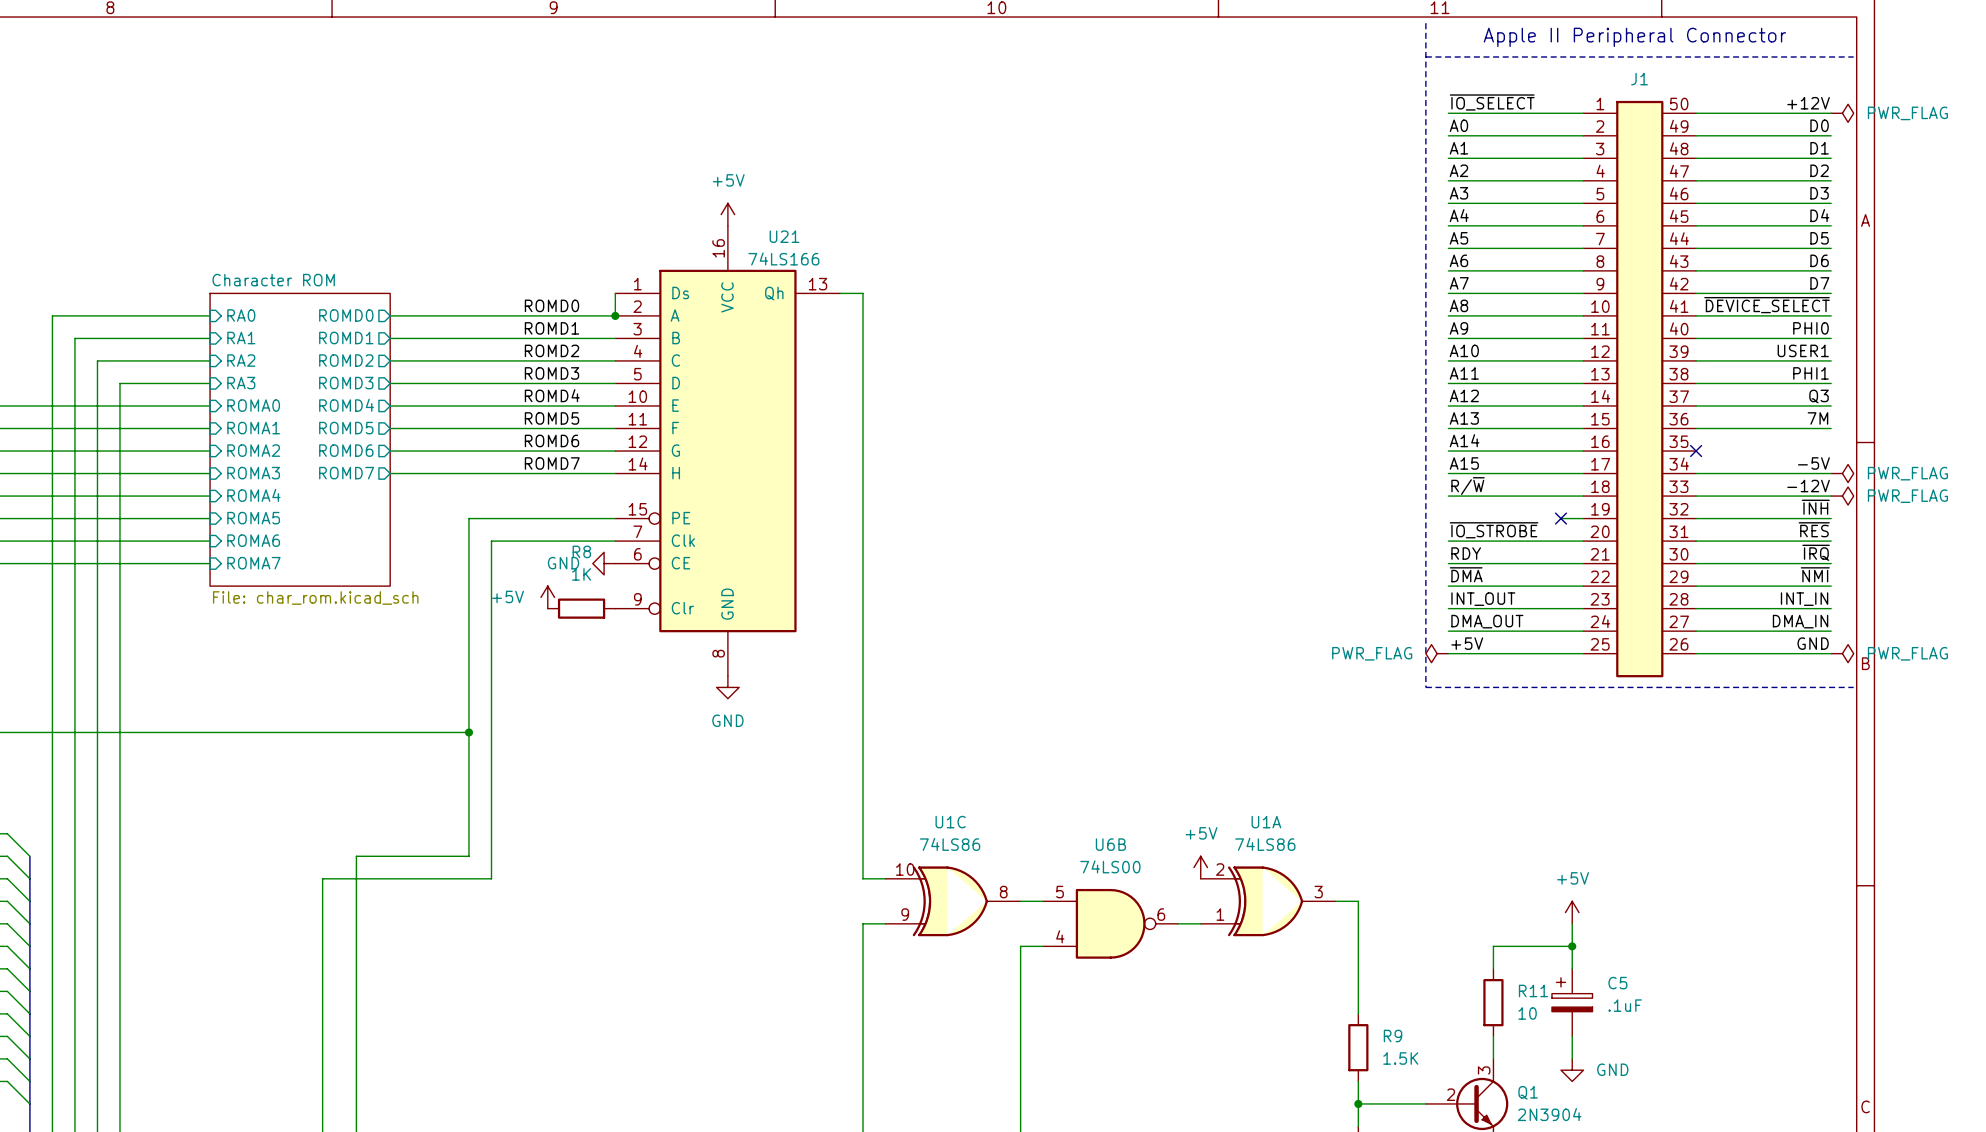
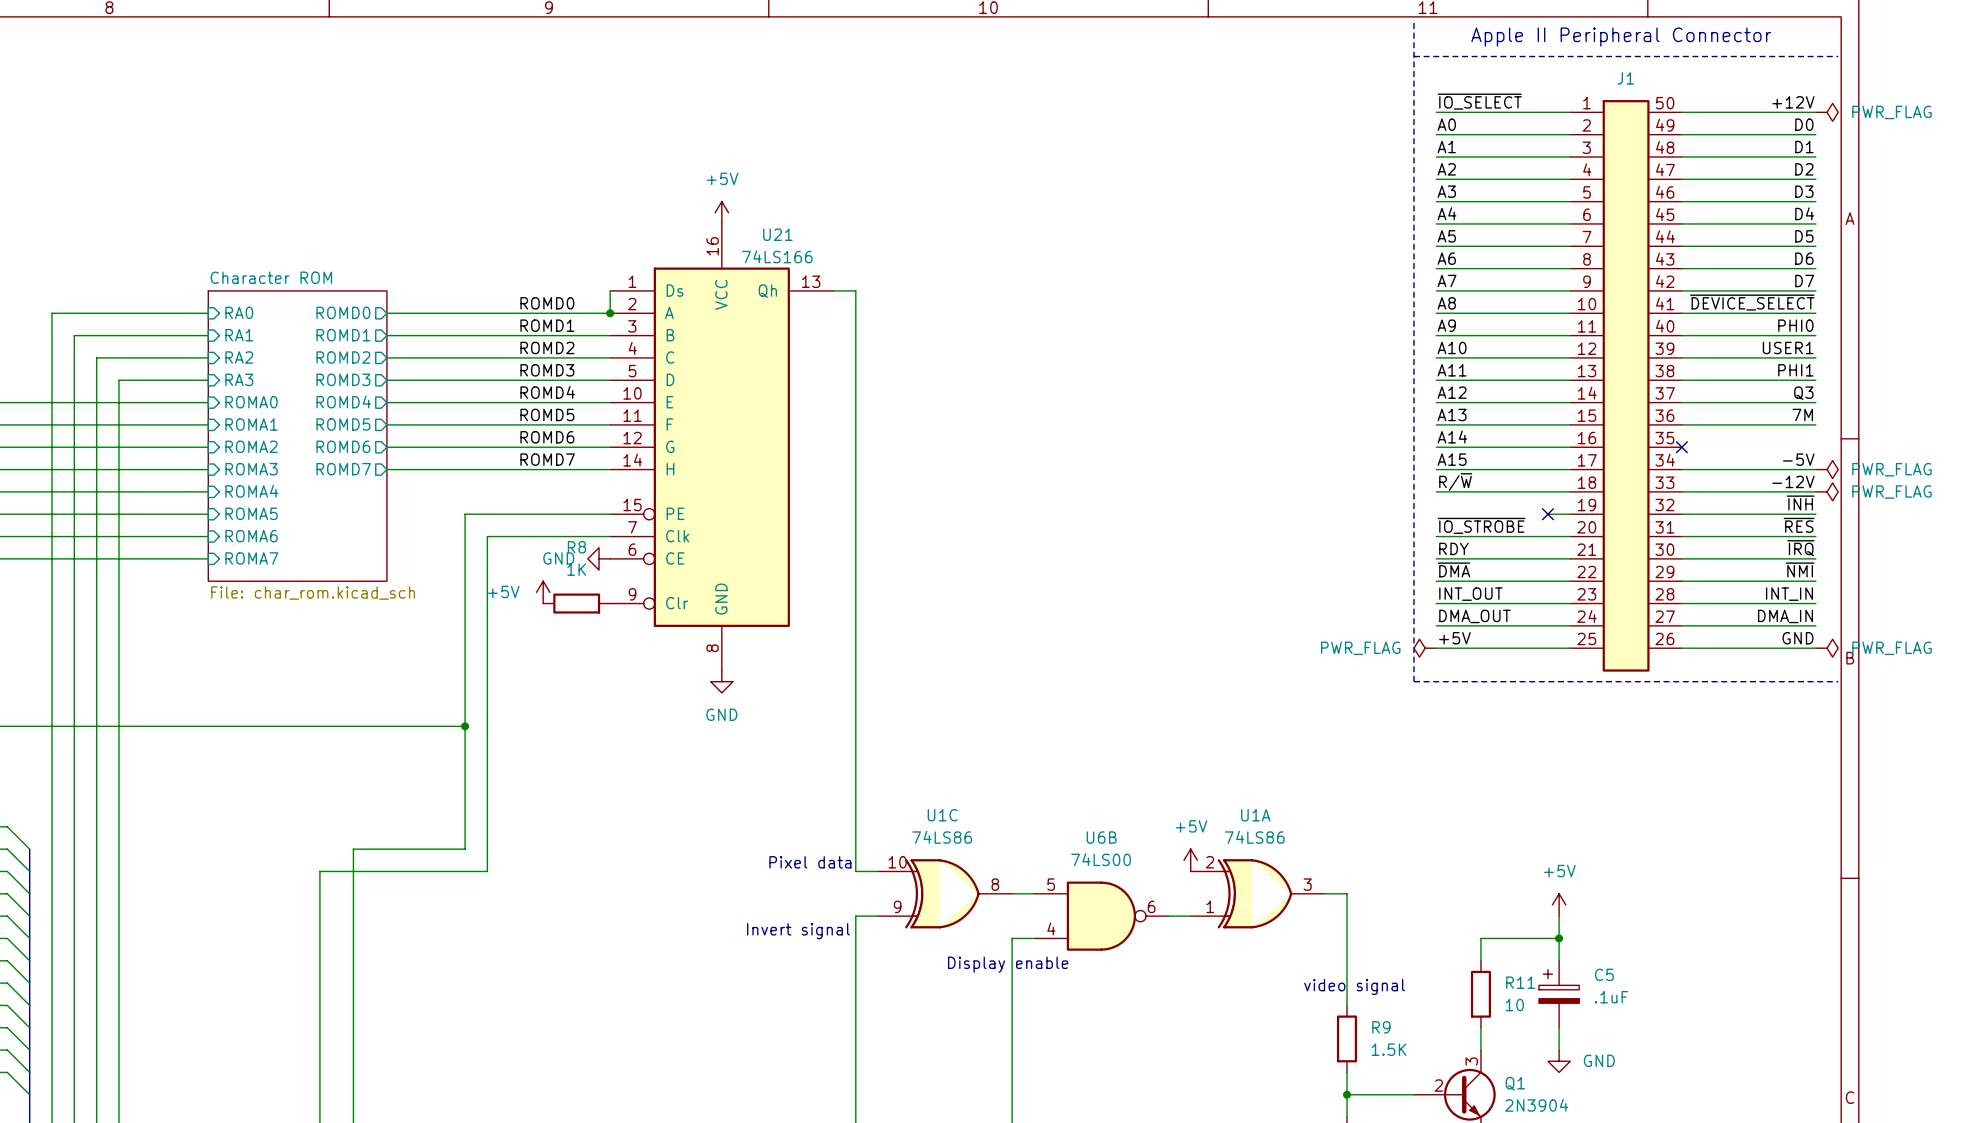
text: none -> Pixel data (810, 862)
text: none -> Invert signal (798, 931)
text: none -> Display enable (1008, 964)
text: none -> video signal (1354, 986)

